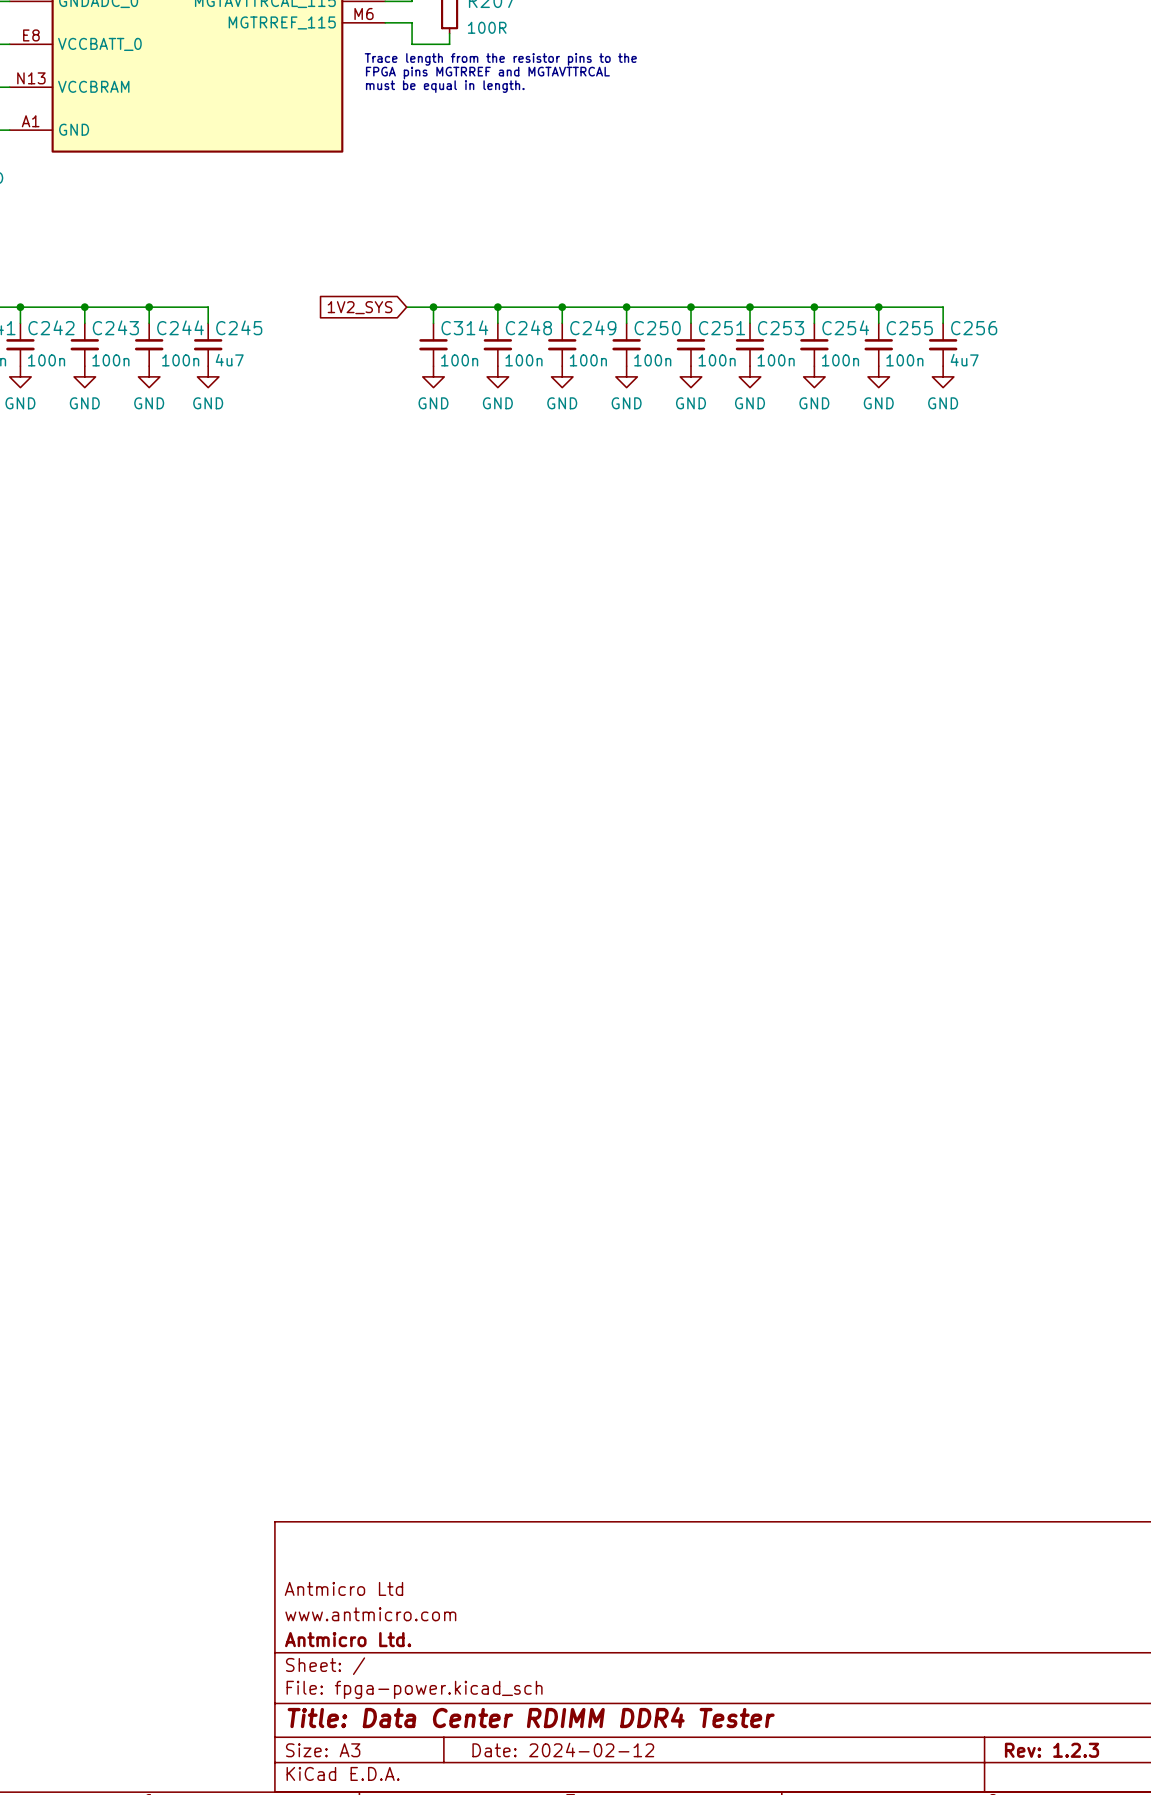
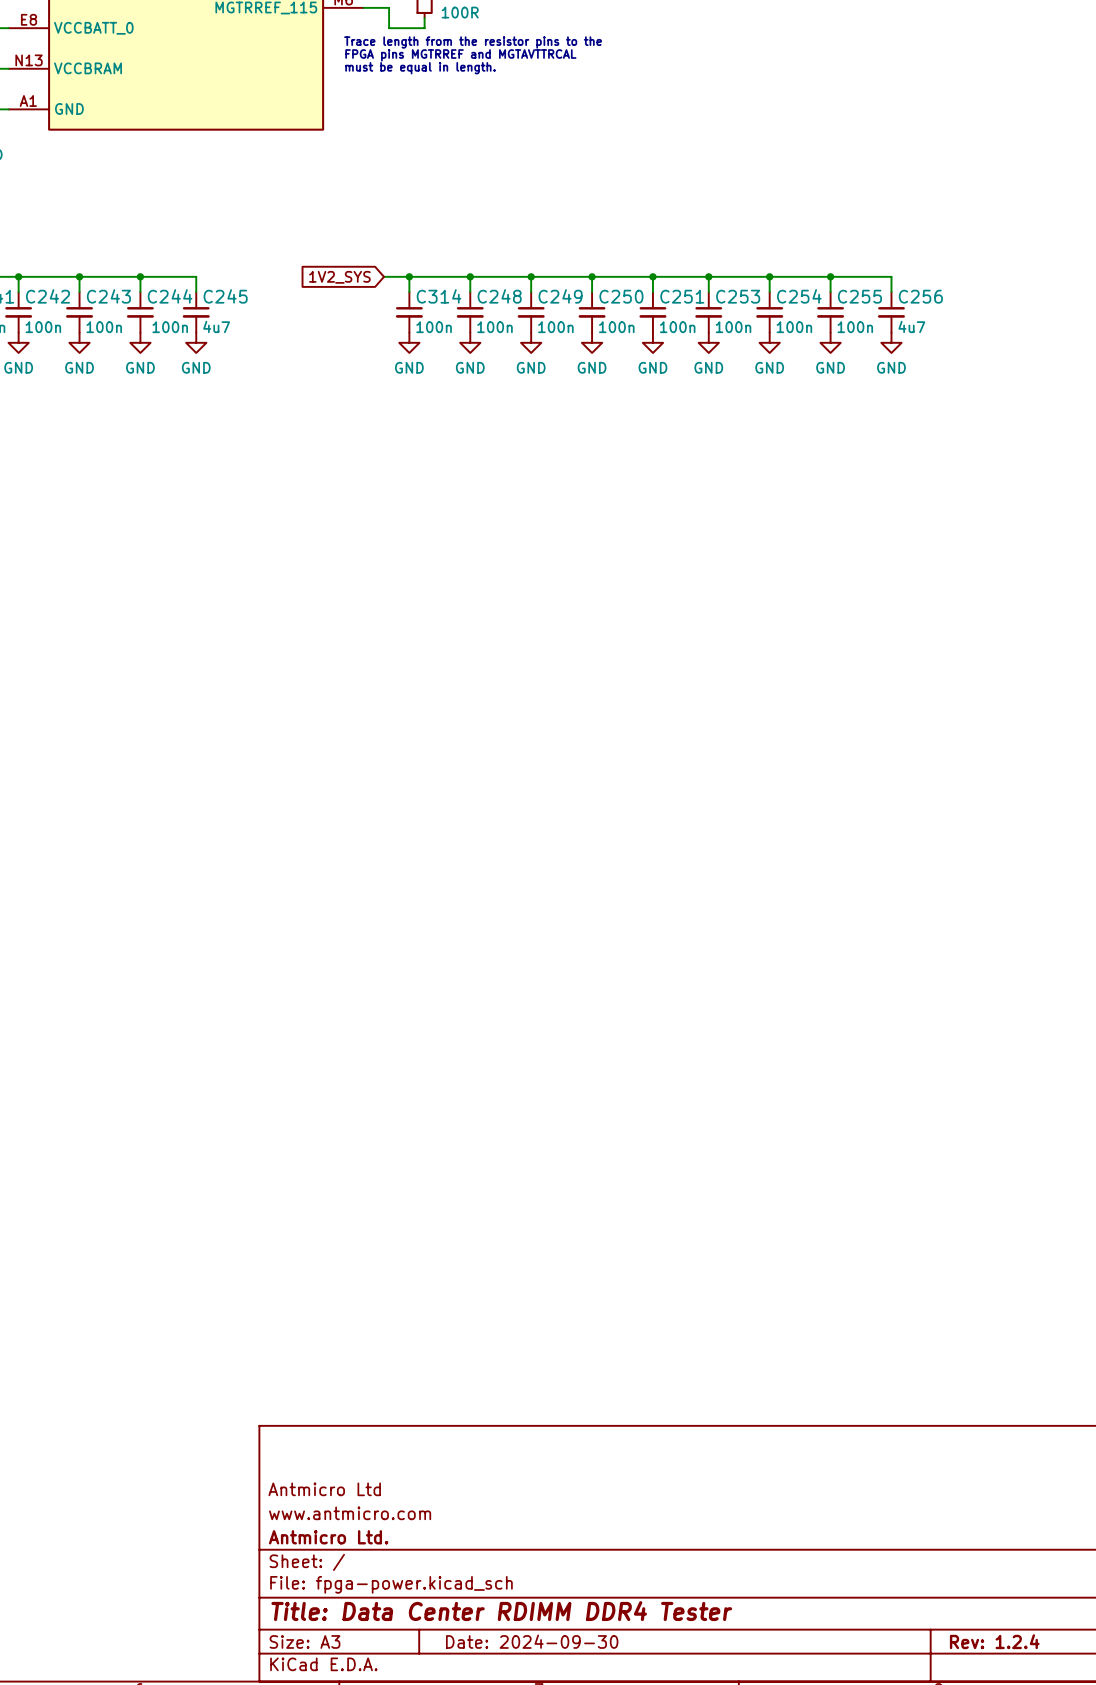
title block: Date: 2024-02-12 (563, 1749) -> Date: 2024-09-30 (532, 1641)
title block: Rev: 1.2.3 (1052, 1750) -> Rev: 1.2.4 (994, 1641)

